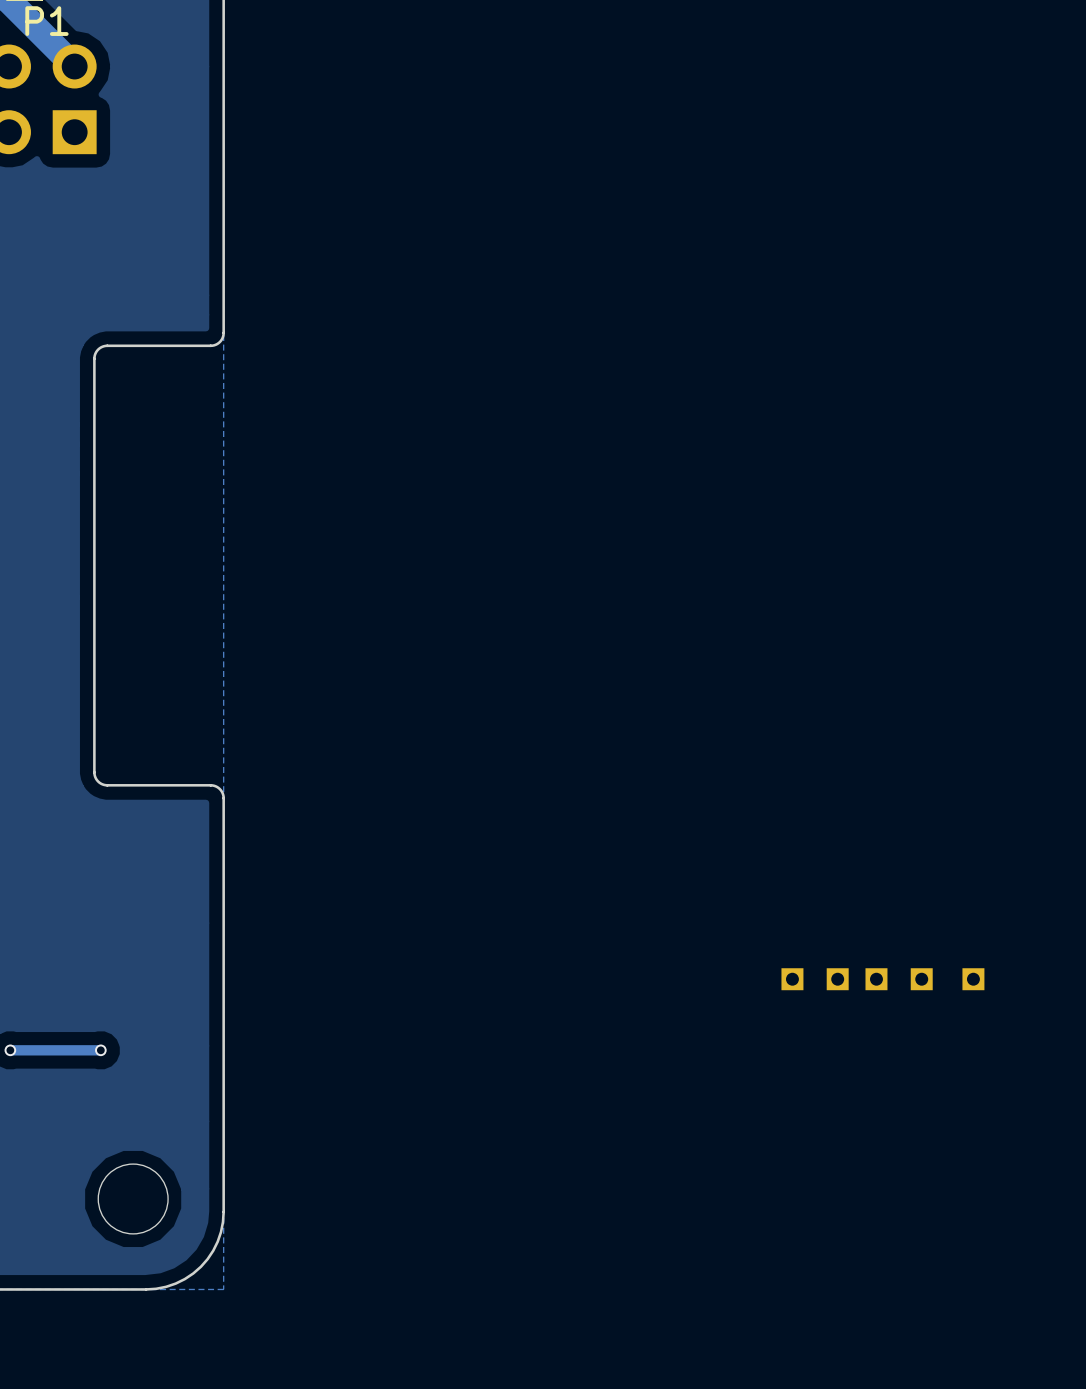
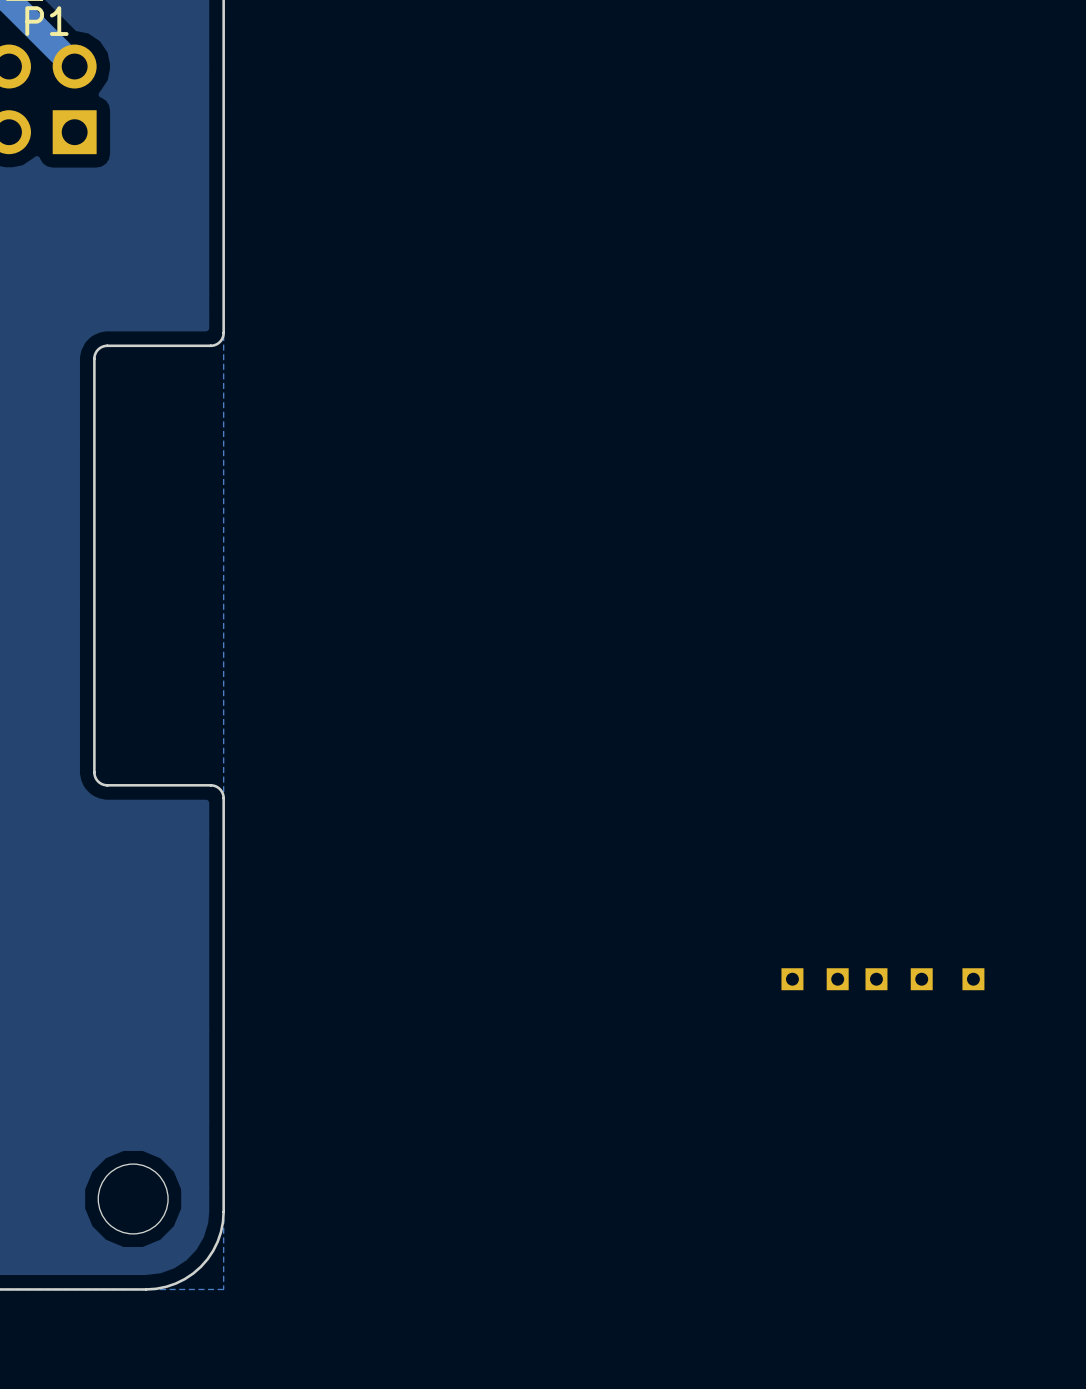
via: (10, 1050) -> none
track: (100, 1050) (10, 1050) -> none
via: (100, 1050) -> none

